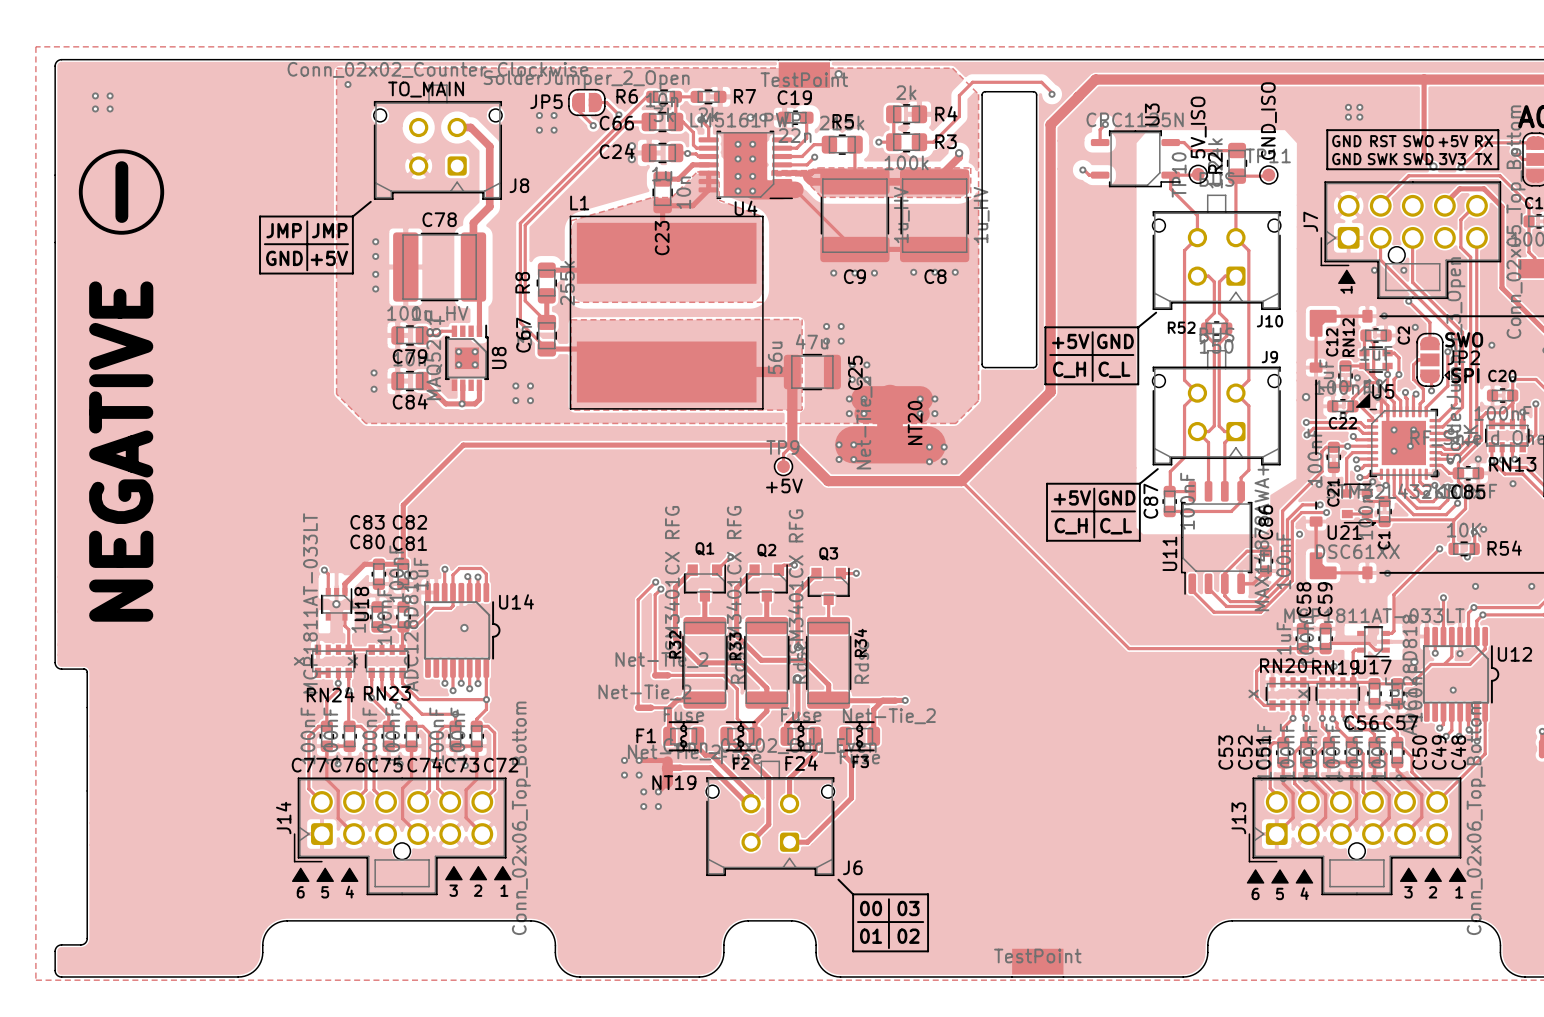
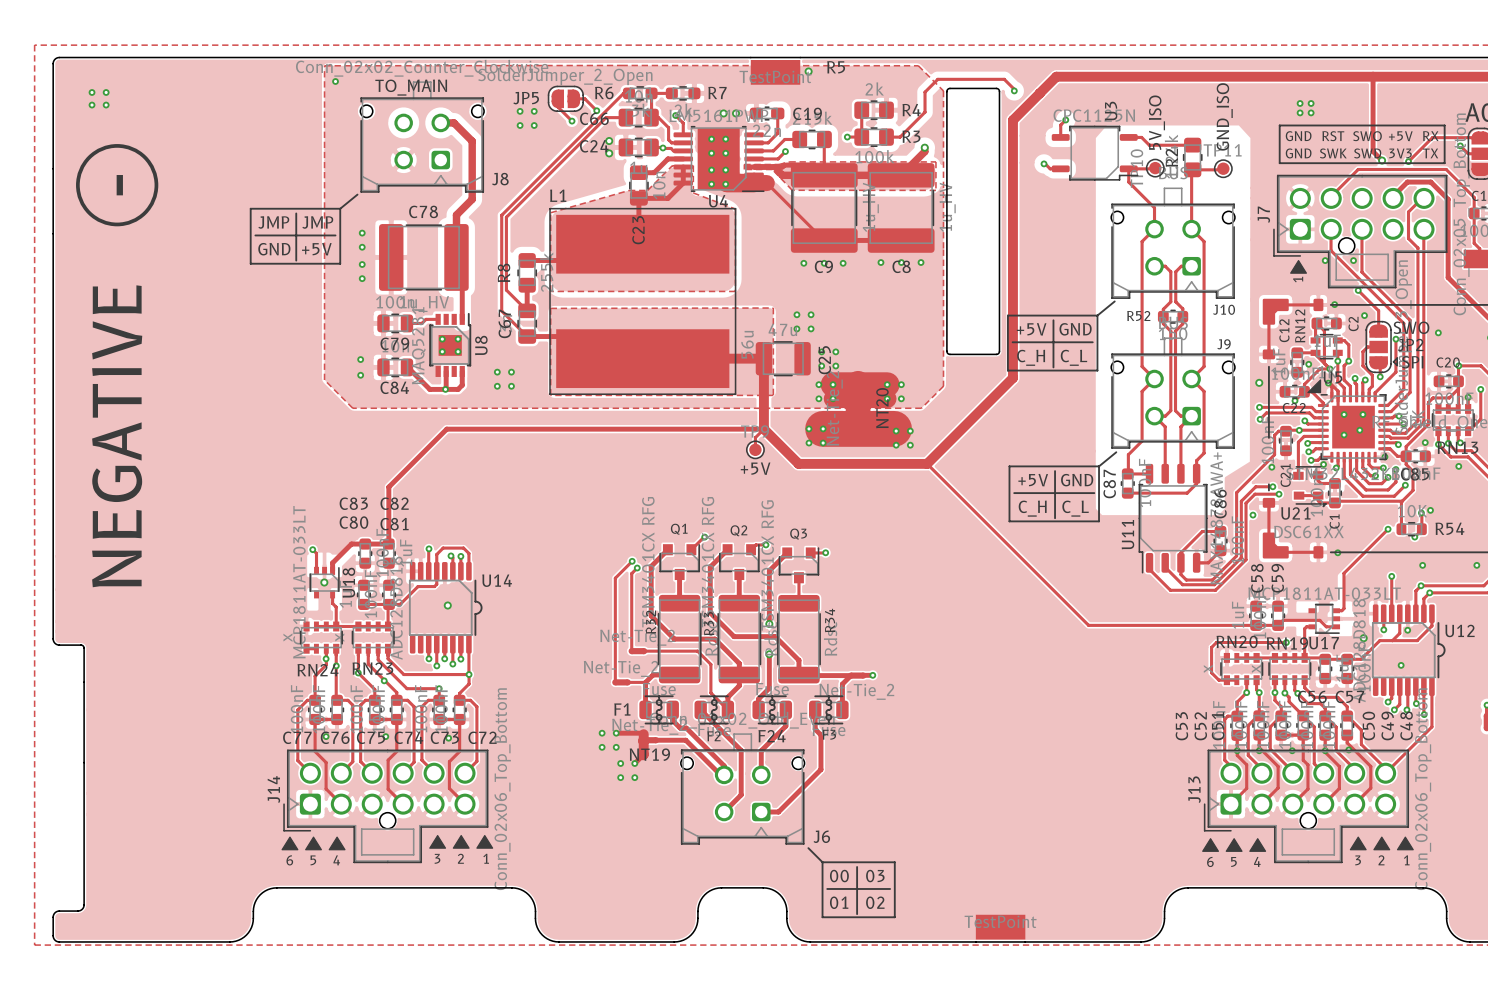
C19 name position: C19 (794, 97) -> C19 (807, 113)
R5 name position: R5 (843, 121) -> R5 (836, 67)

